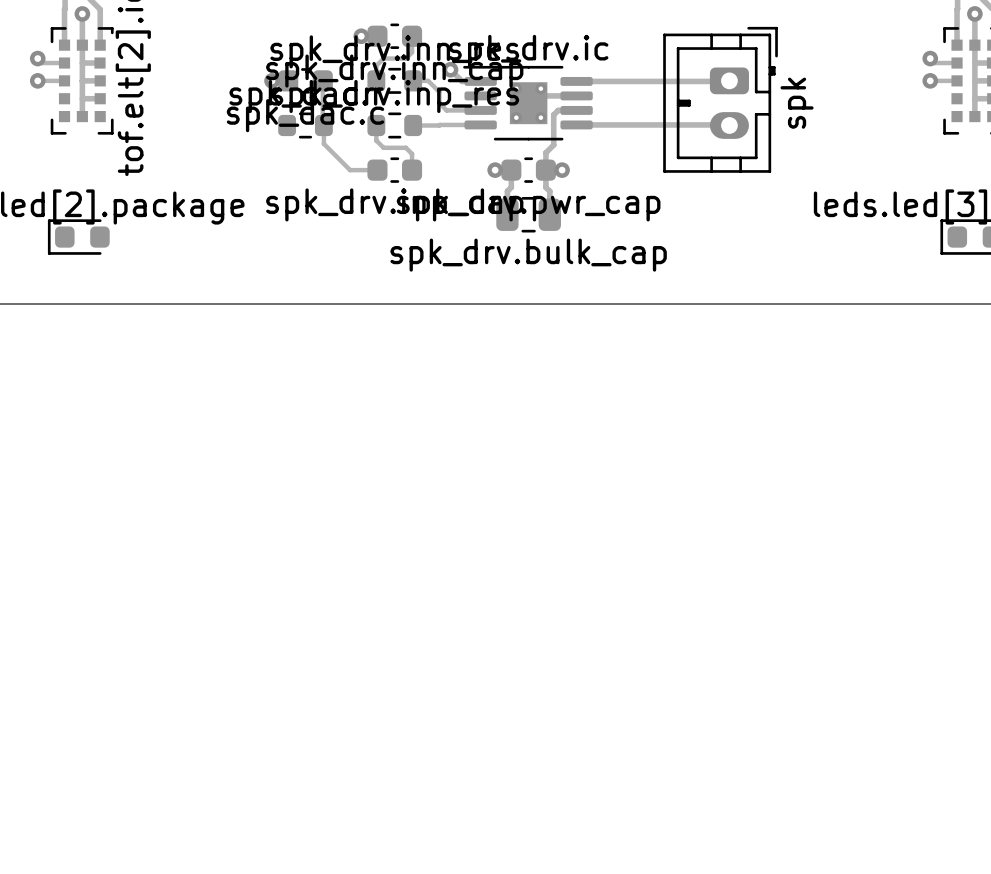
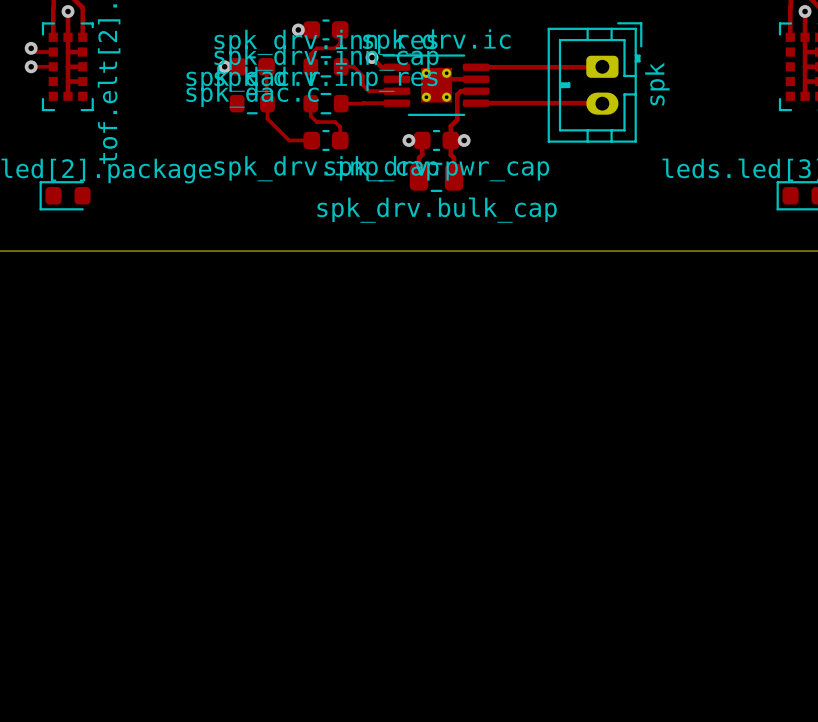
track: (930, 58) (934, 63) (957, 63) -> none
via: (930, 58) -> none
track: (930, 80) (957, 80) -> none
via: (930, 80) -> none

